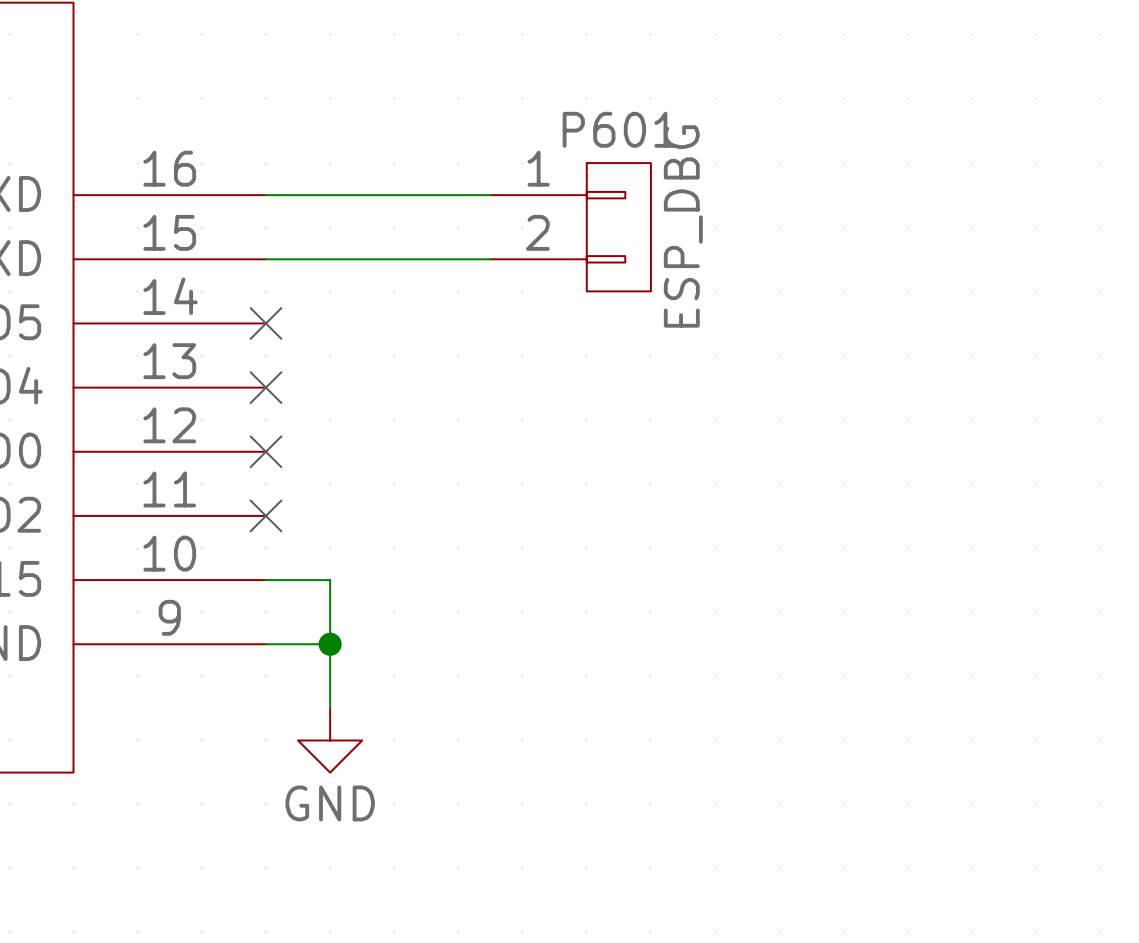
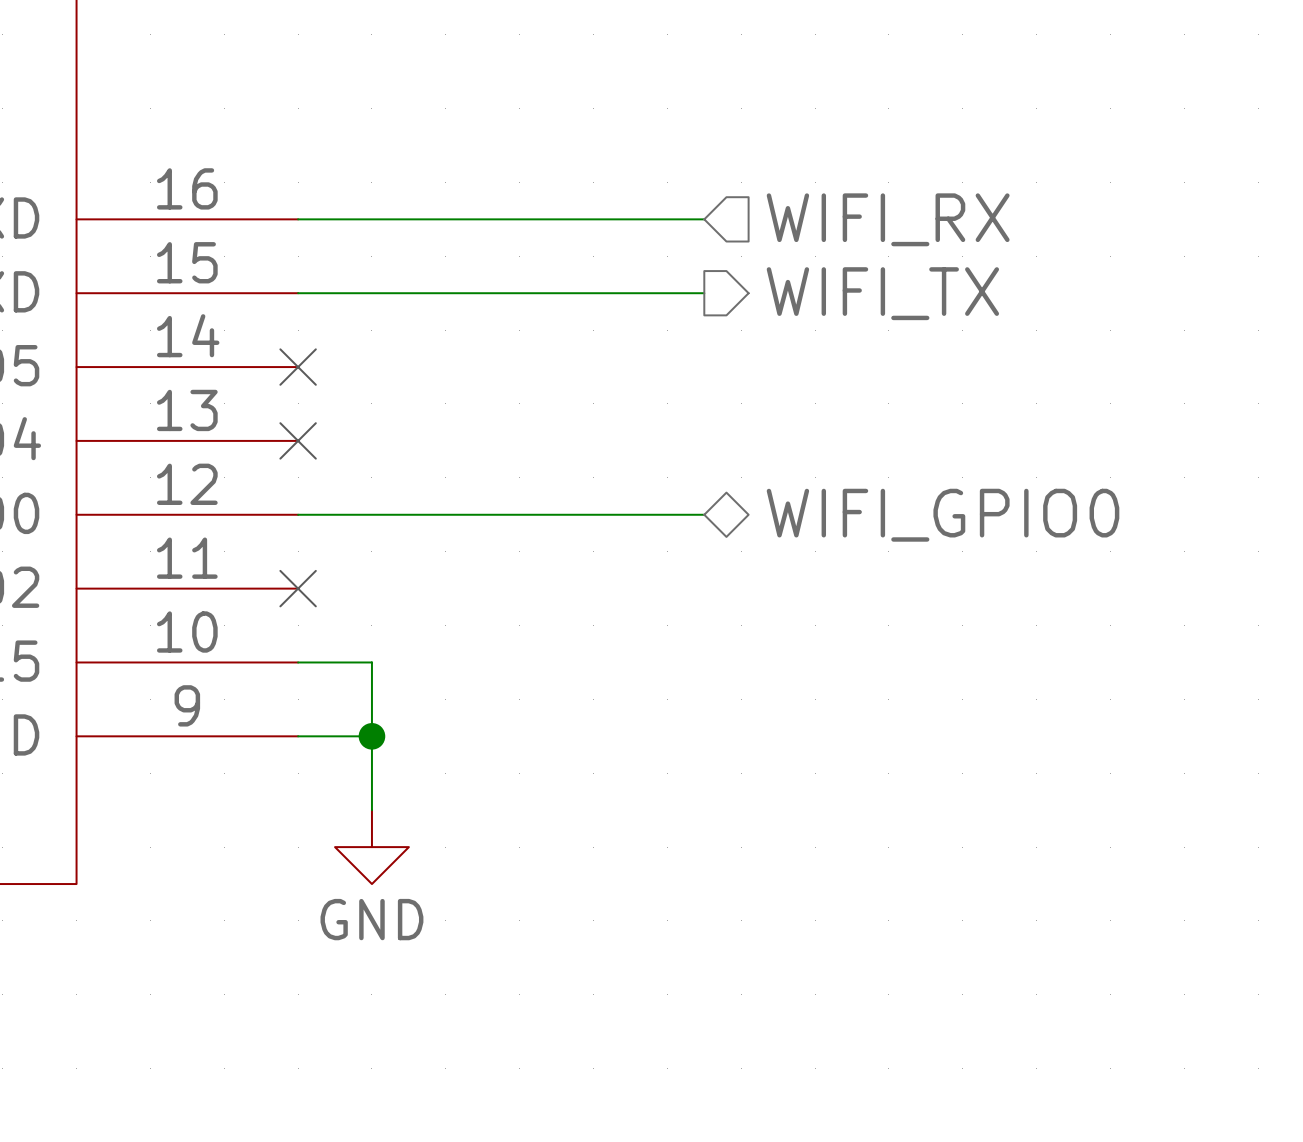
hierarchical label: none -> WIFI_RX (888, 219)
P601: ESP_DBG (570, 227) -> none
hierarchical label: none -> WIFI_TX (882, 293)
wire: none -> (298, 514) (704, 514)
no-connect mark: (265, 451) -> none
hierarchical label: none -> WIFI_GPIO0 (943, 515)

